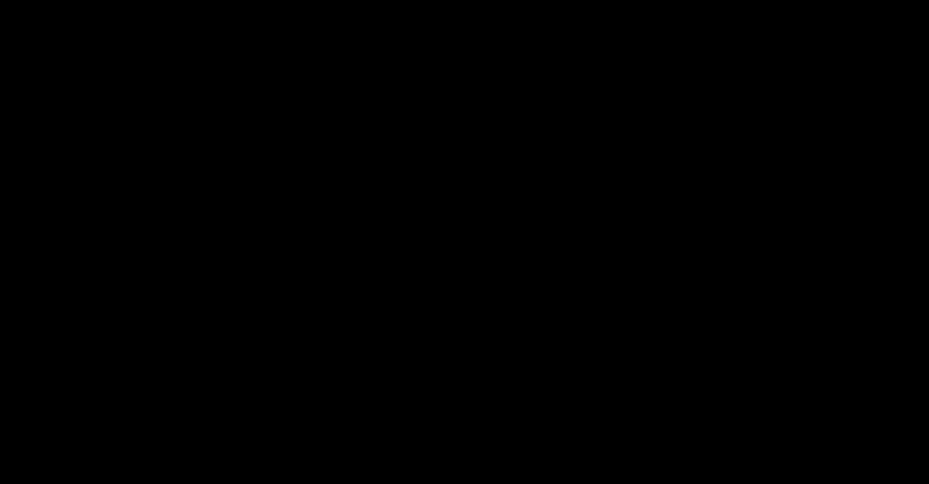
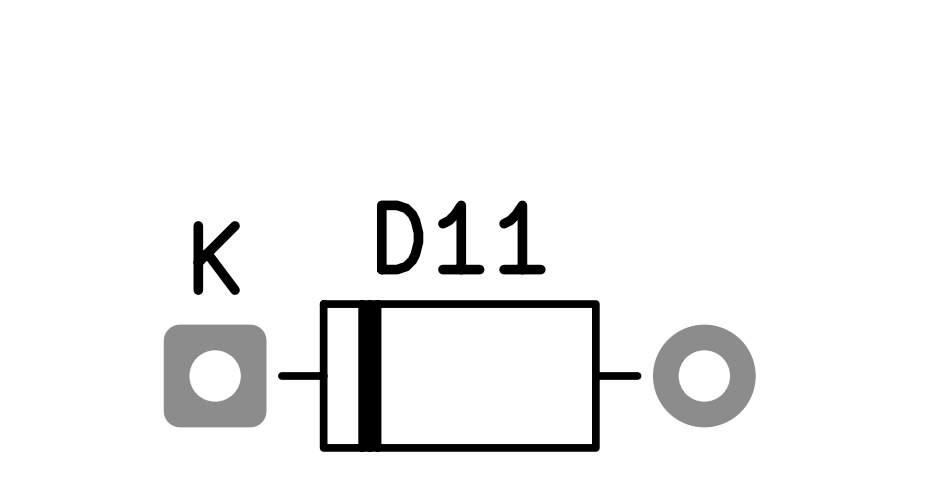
D11: none -> (459, 375)

